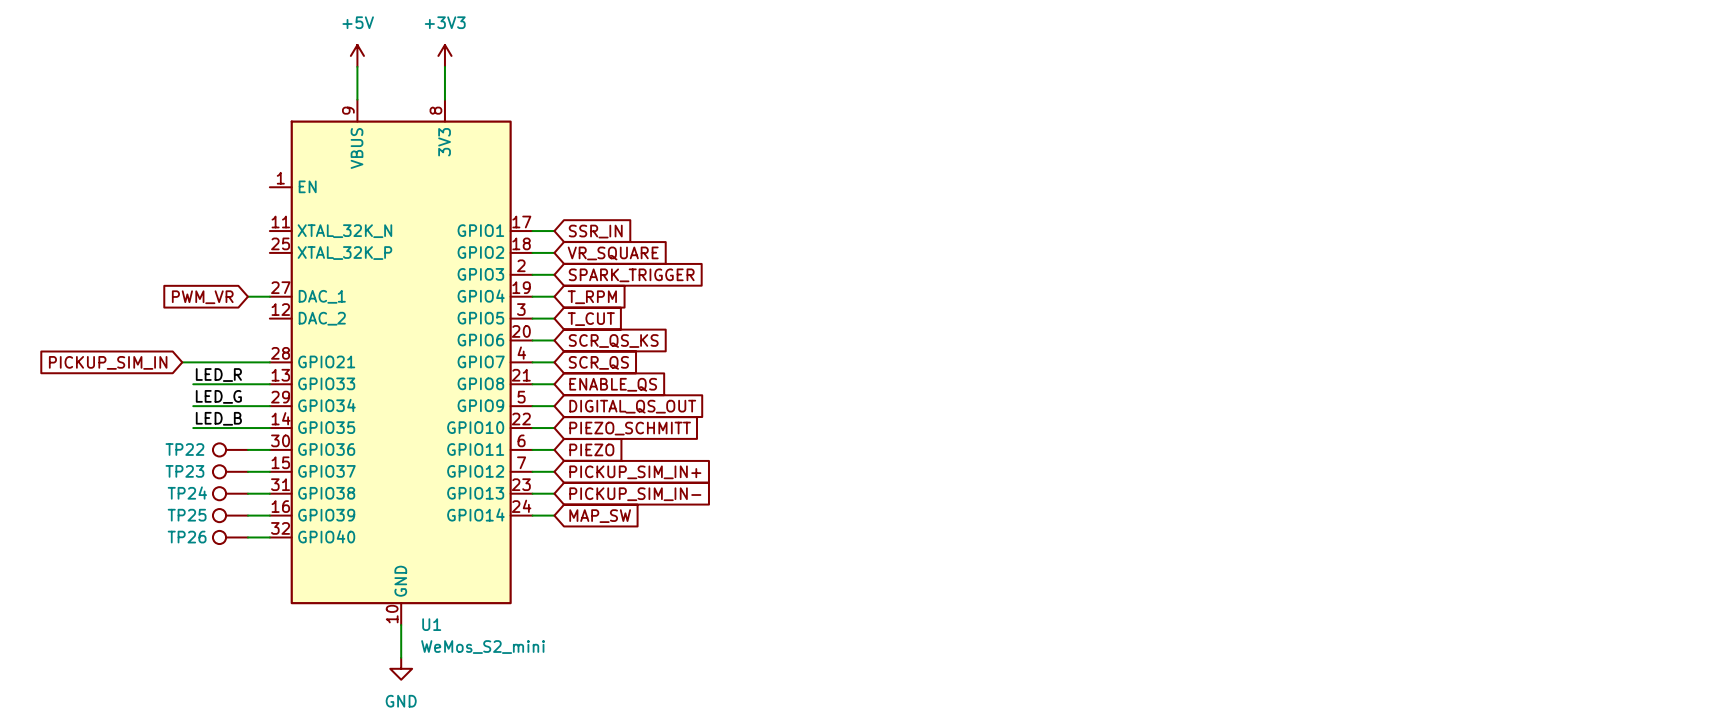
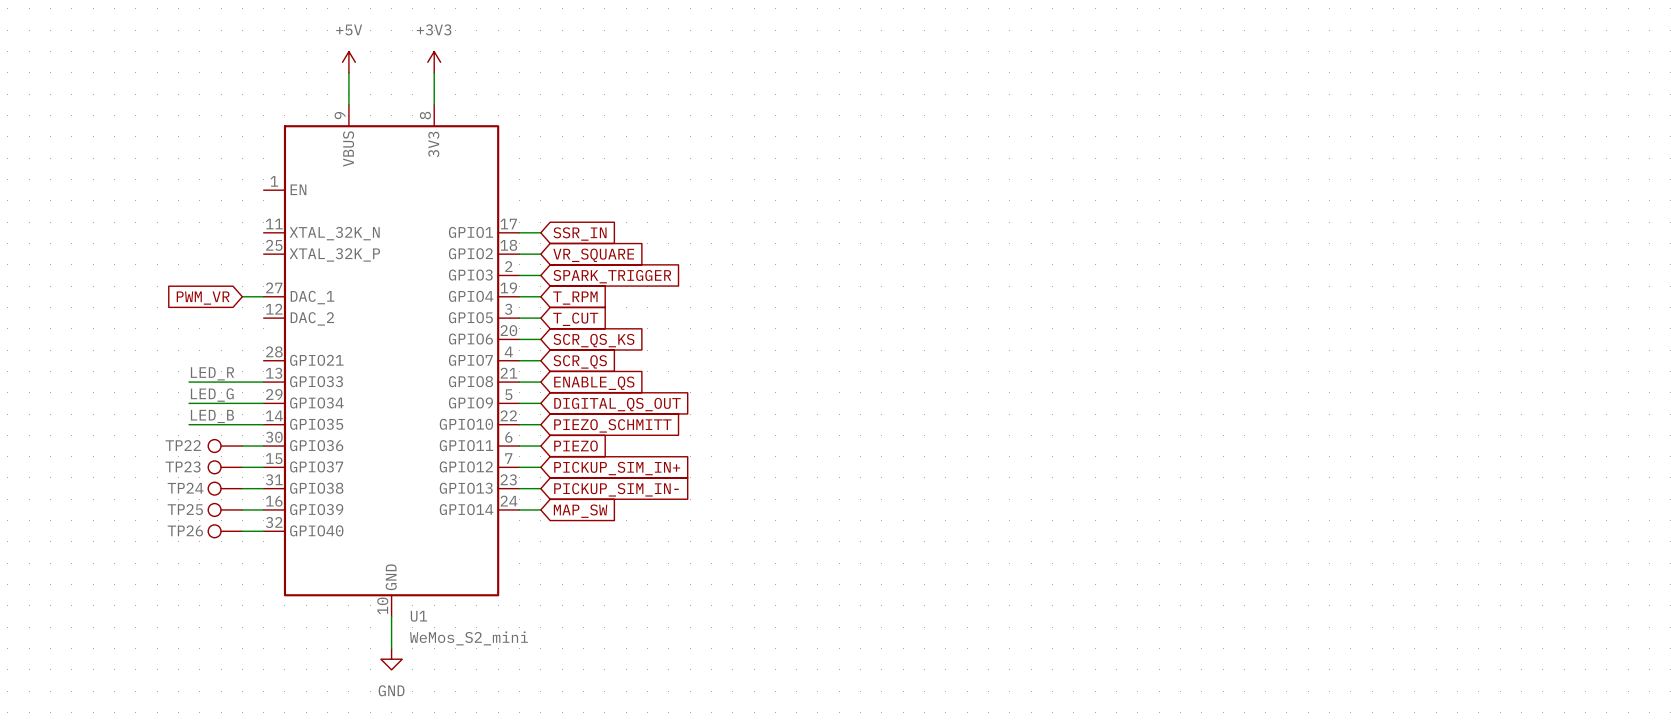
global label: PICKUP_SIM_IN (108, 362) -> none
wire: (182, 362) (269, 362) -> none

